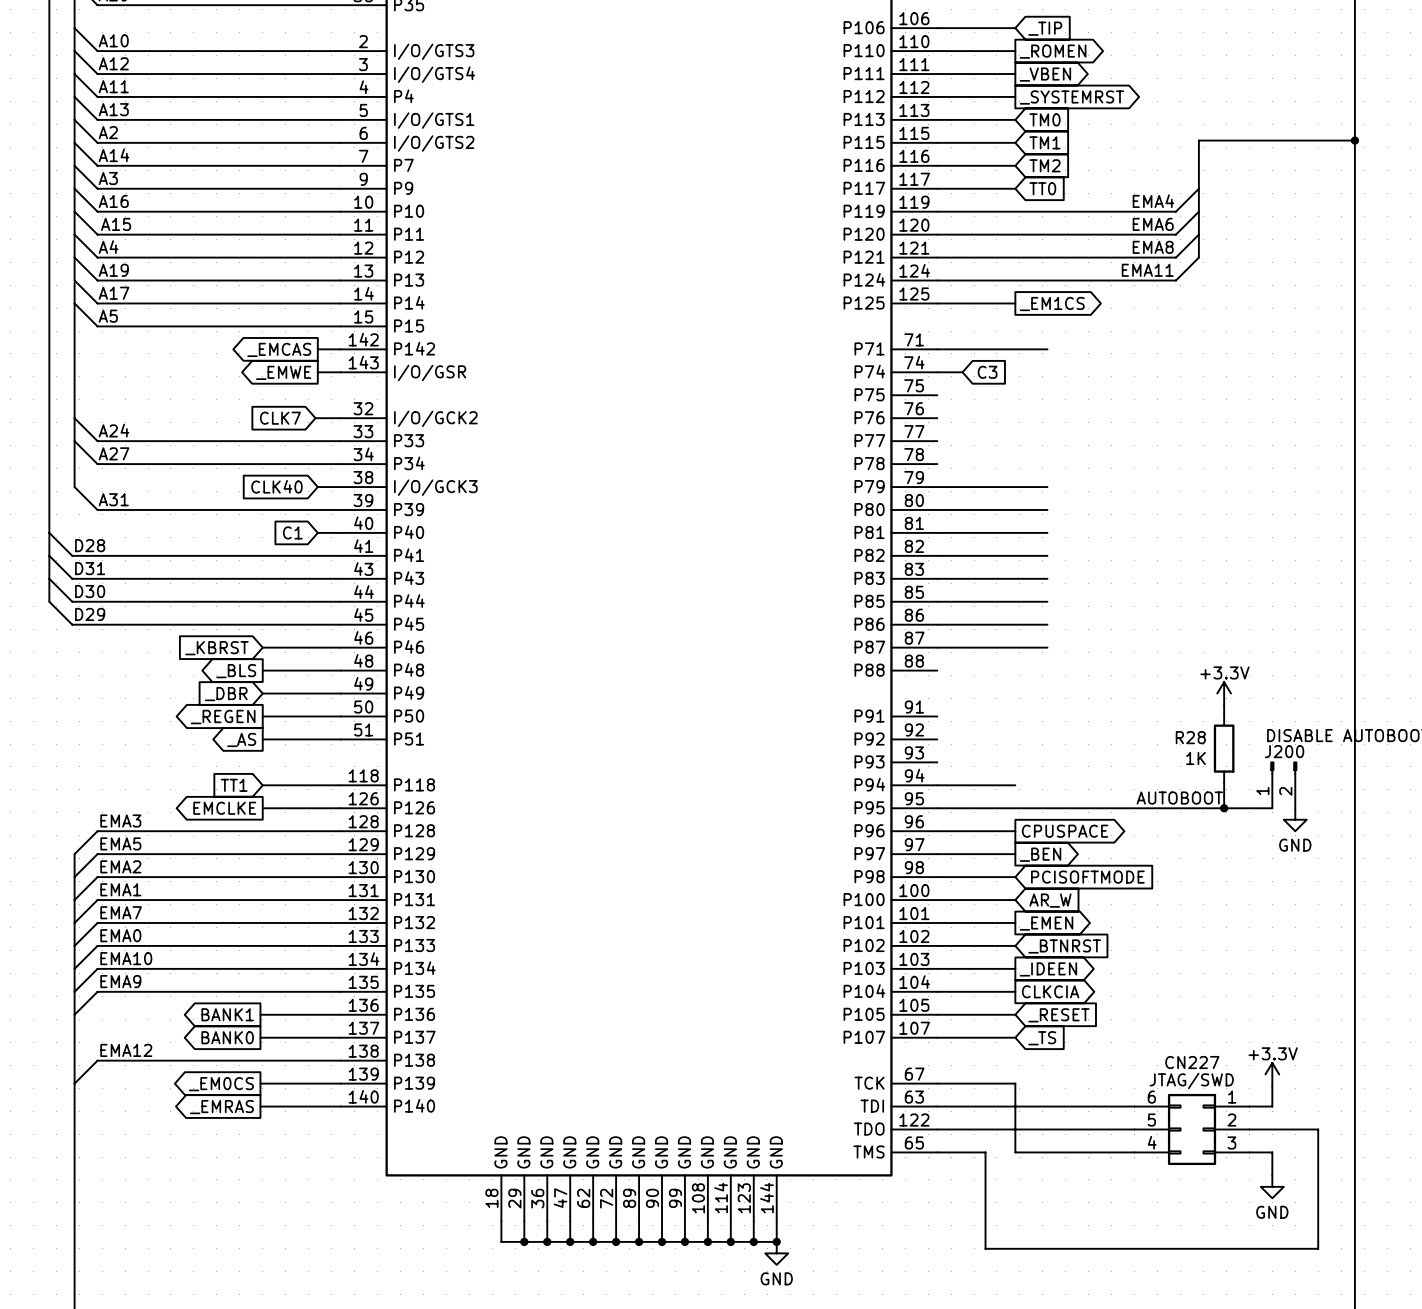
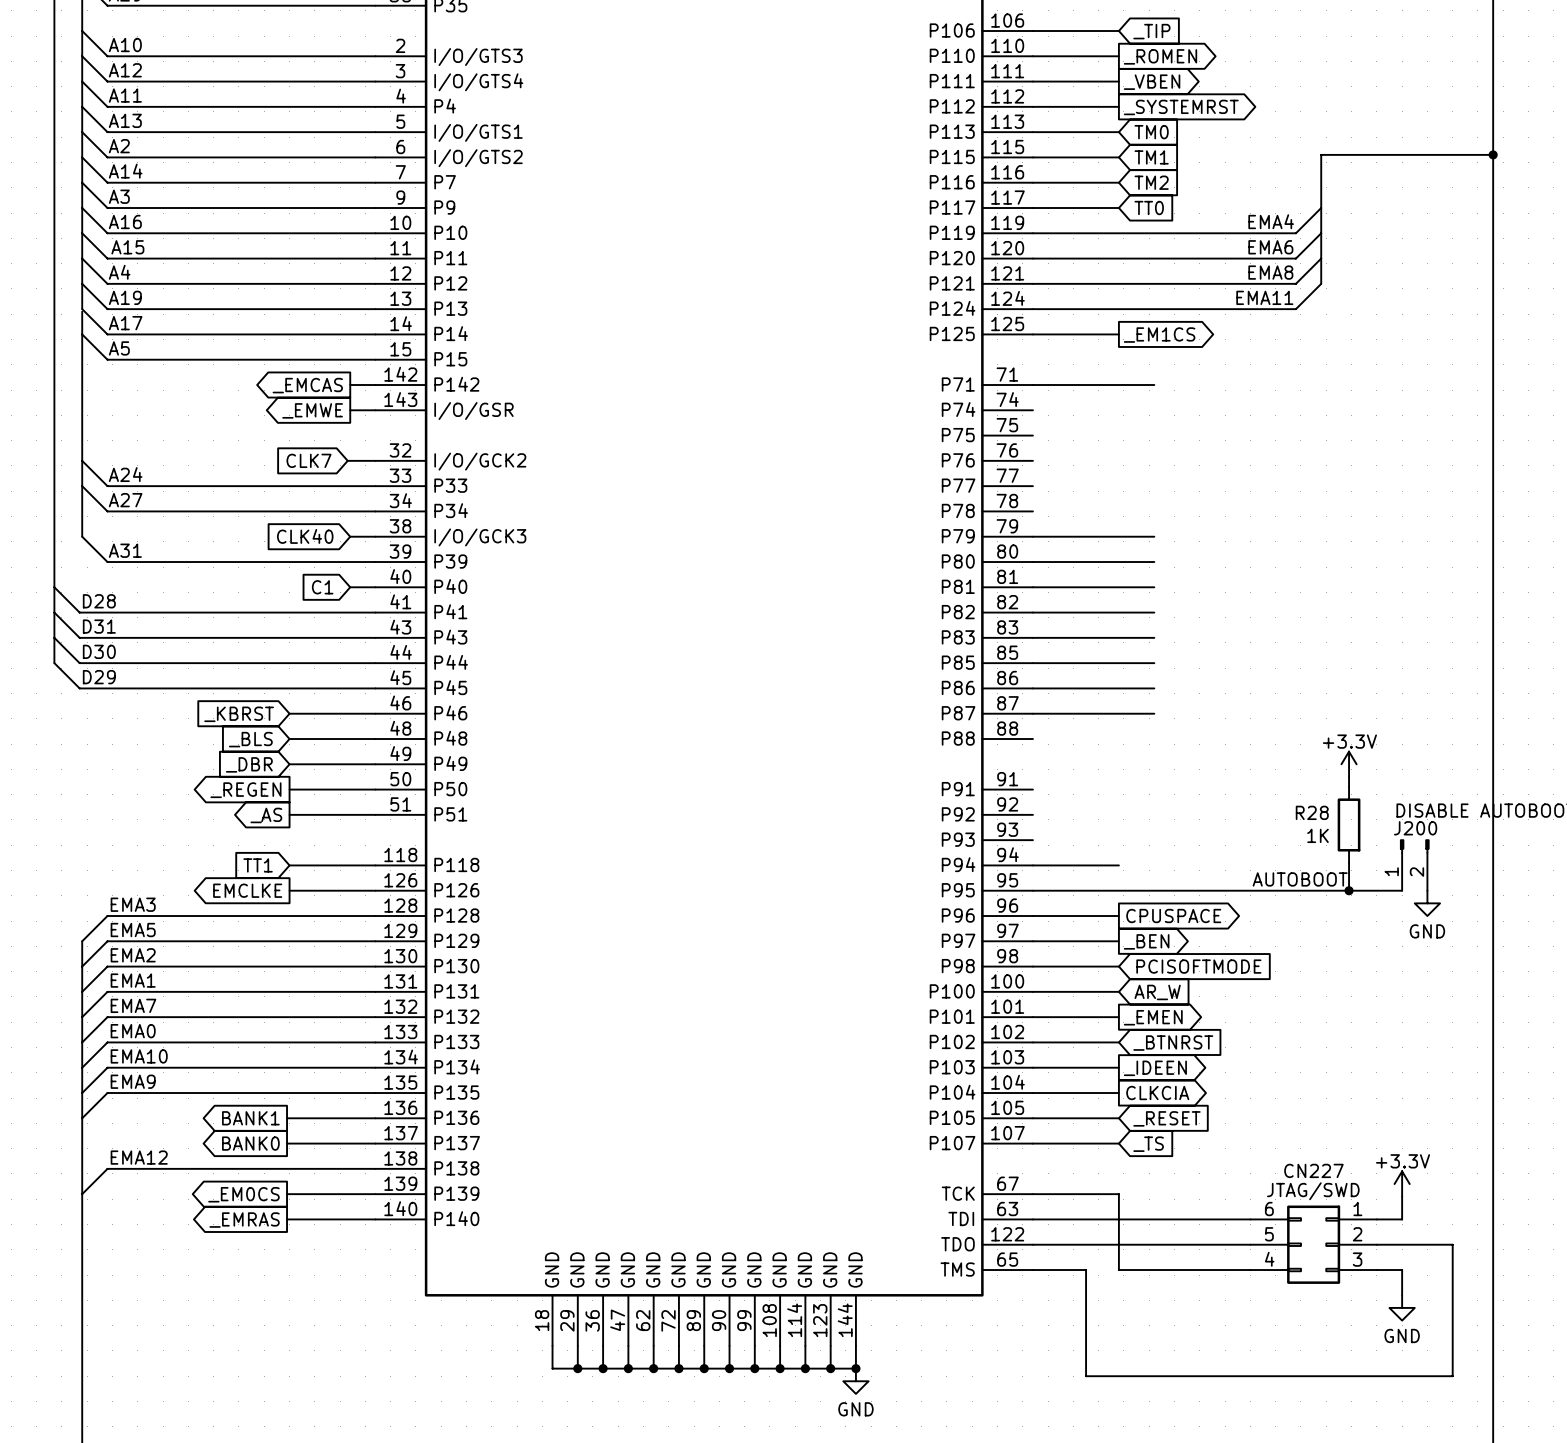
wire: (937, 372) (962, 372) -> none
global label: C3 (987, 372) -> none
global label shape: output (236, 671) -> input (250, 739)

